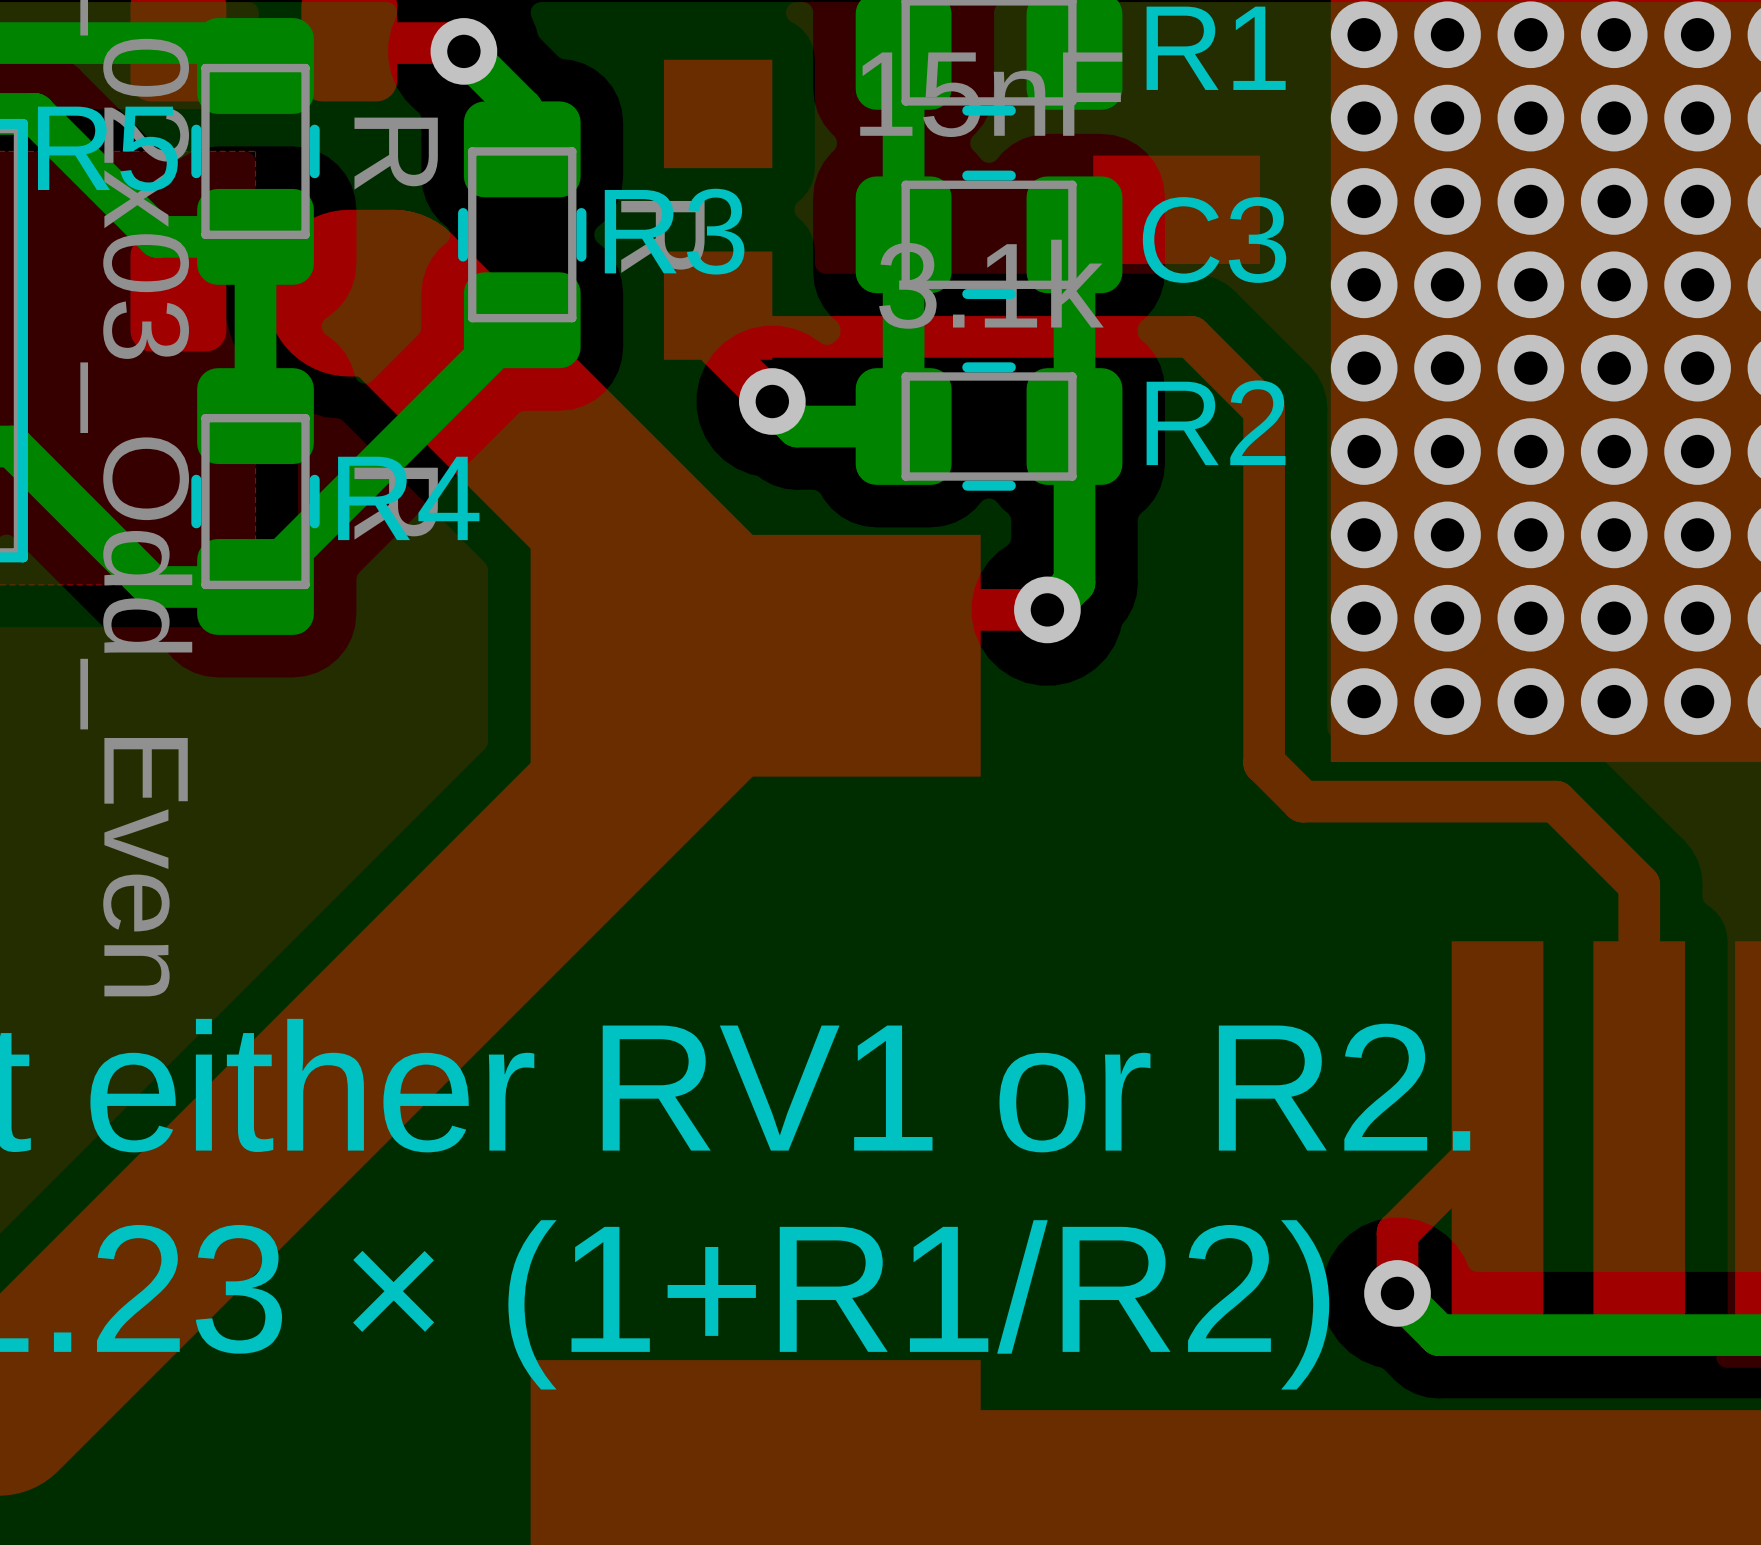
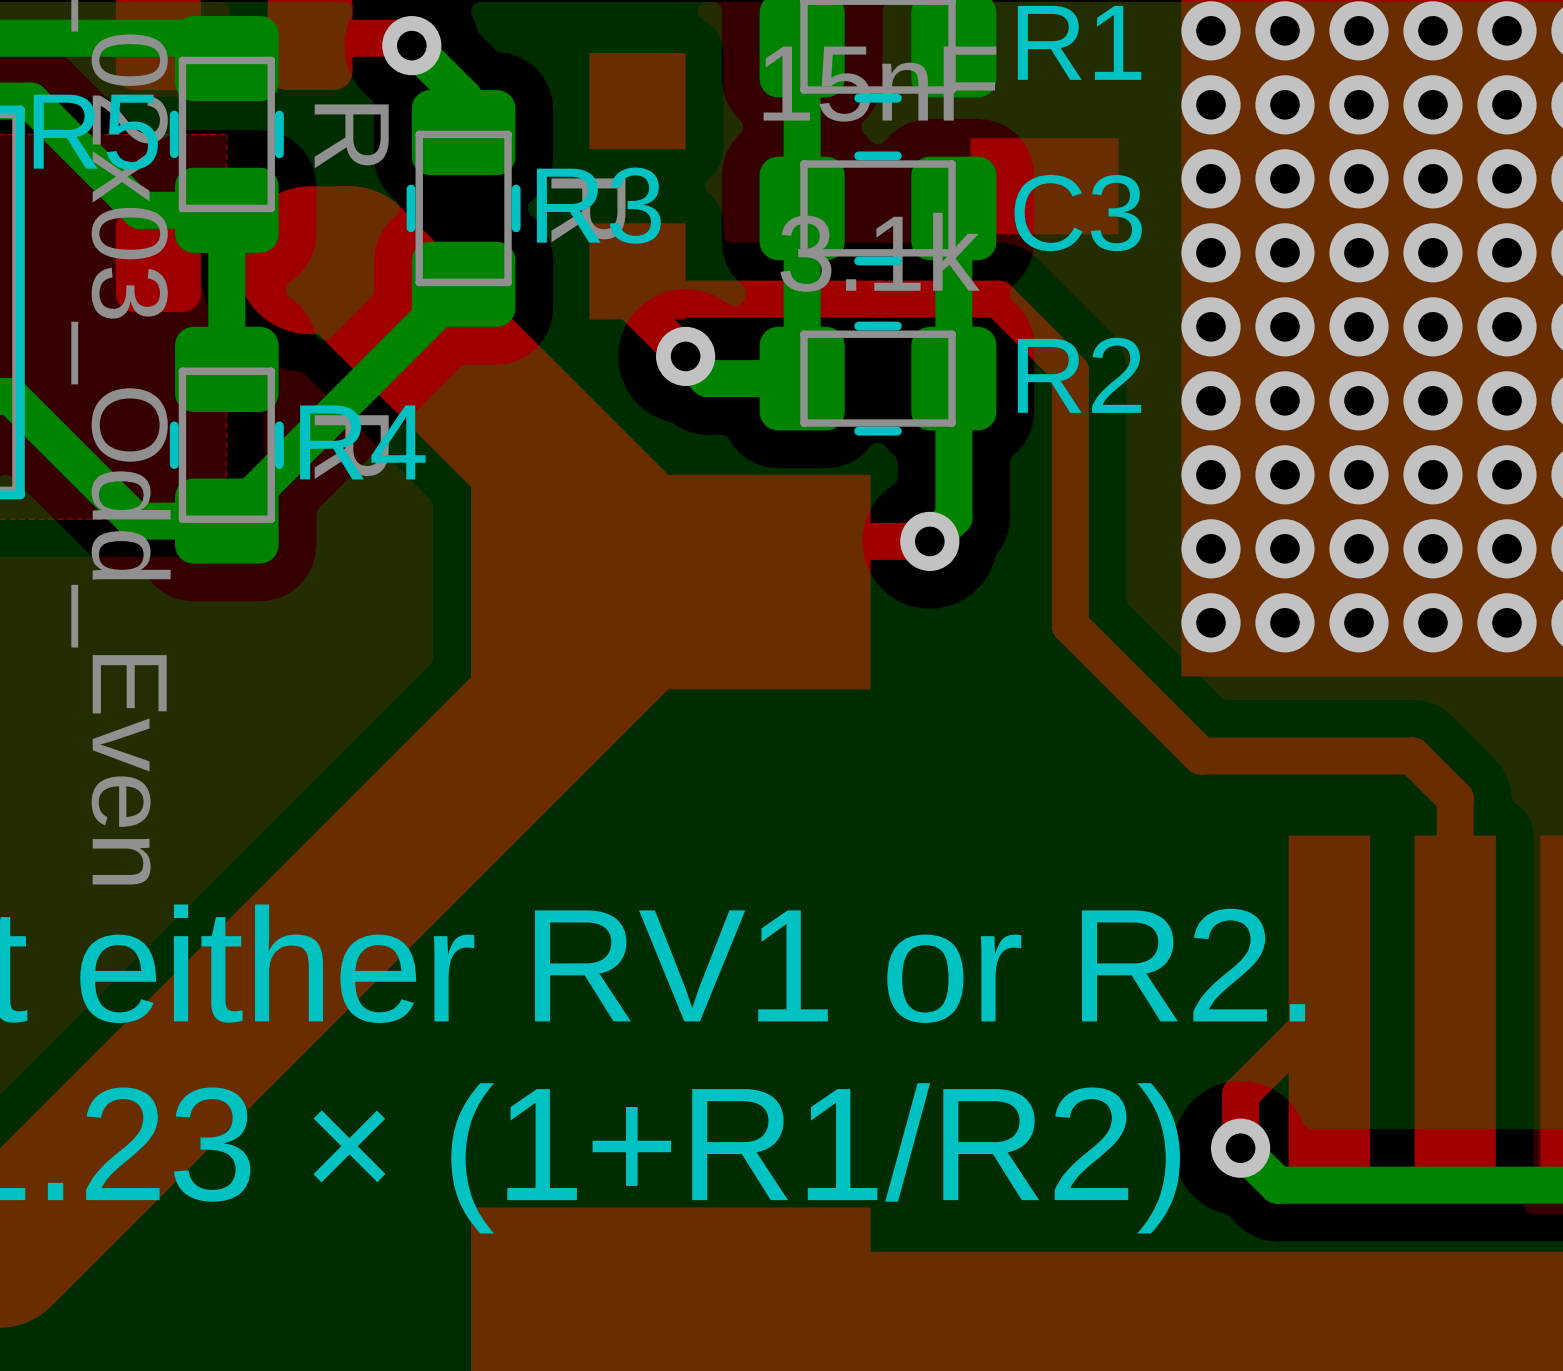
top track: (1124, 336) (1191, 336) (1264, 409) (1264, 762) -> (998, 299) (1070, 371) (1070, 625) (1122, 677)
top track: (1302, 801) (1555, 801) (1639, 884) (1639, 899) -> (1156, 711) (1201, 756) (1412, 756) (1455, 798)

